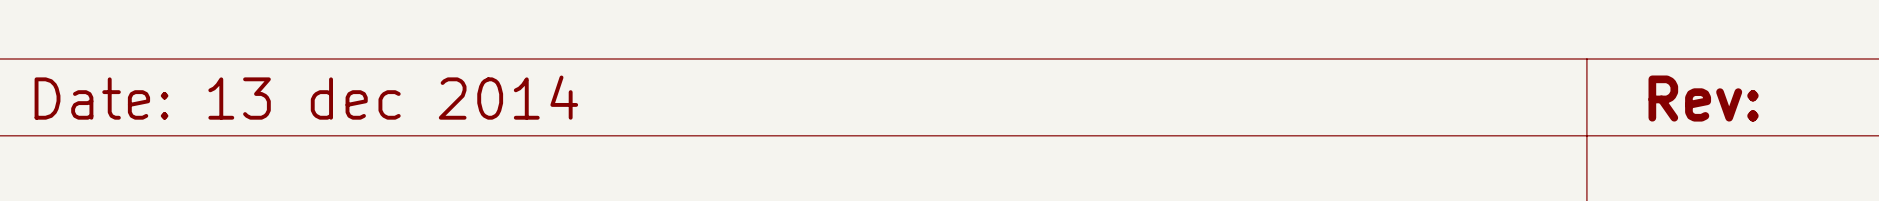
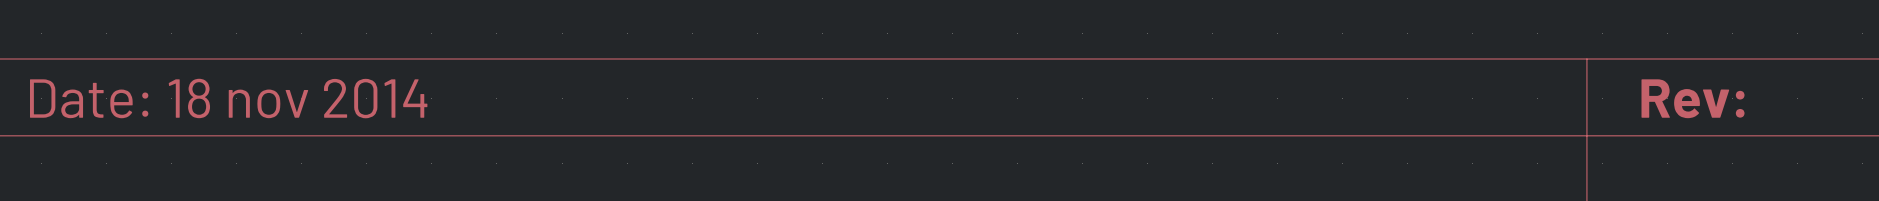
title block: Date: 13 dec 2014 (306, 97) -> Date: 18 nov 2014 (228, 98)

